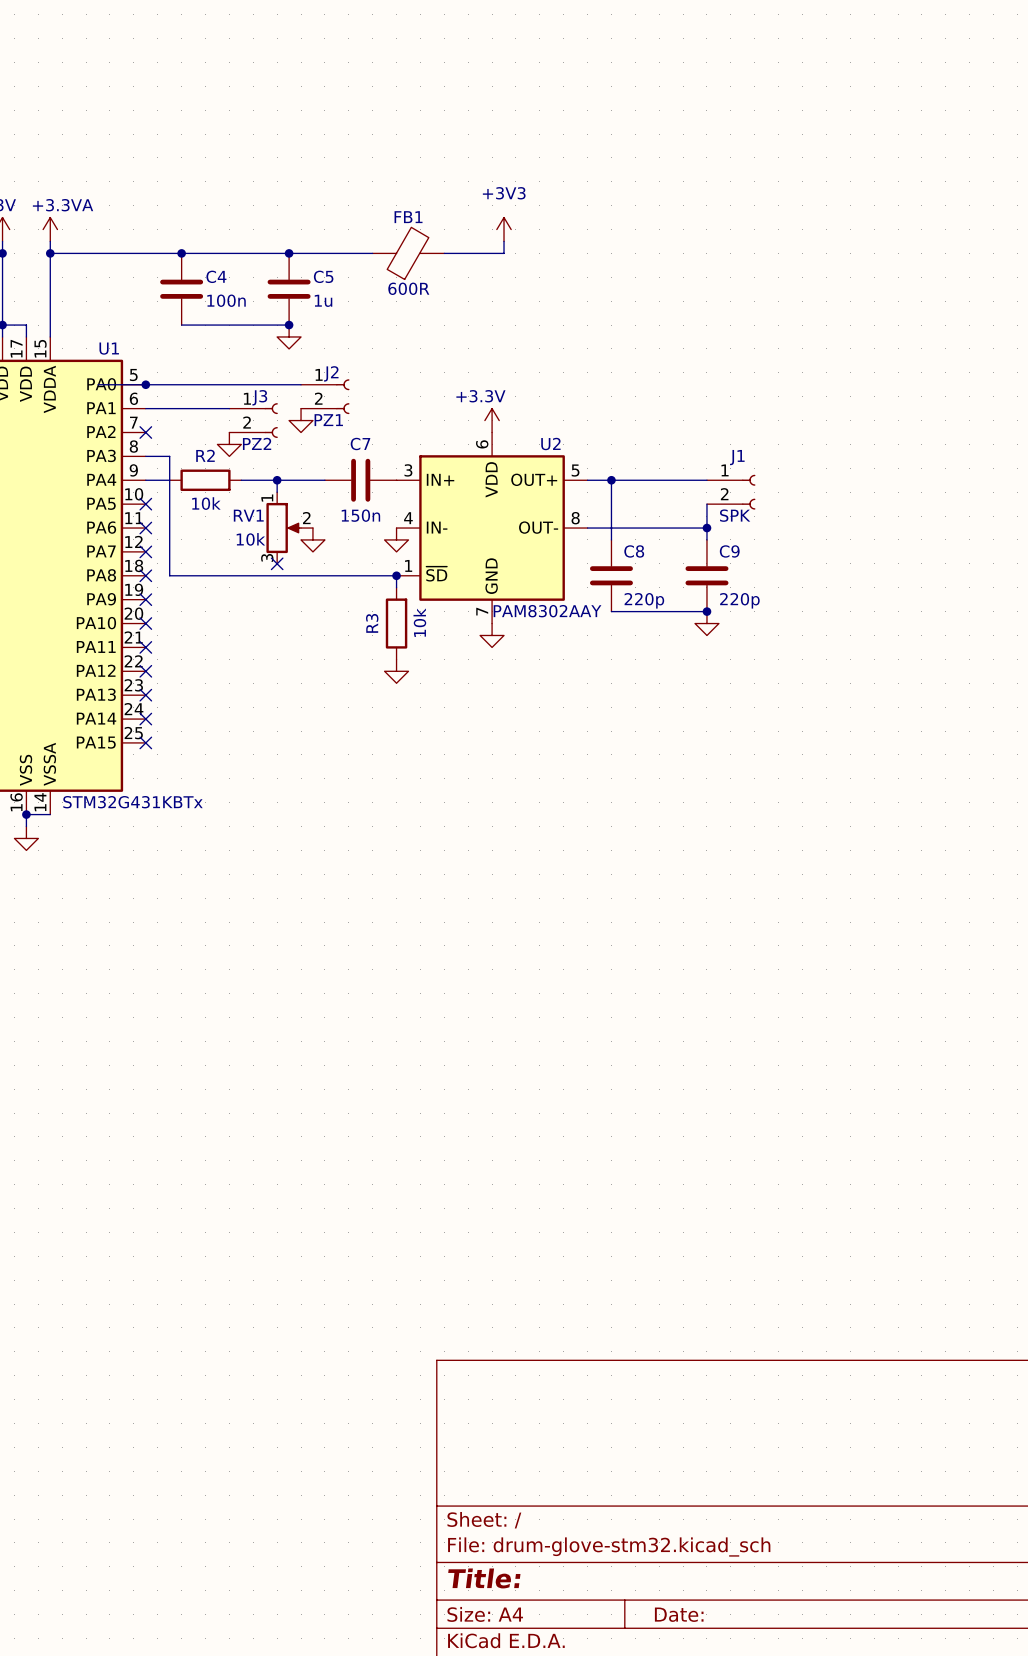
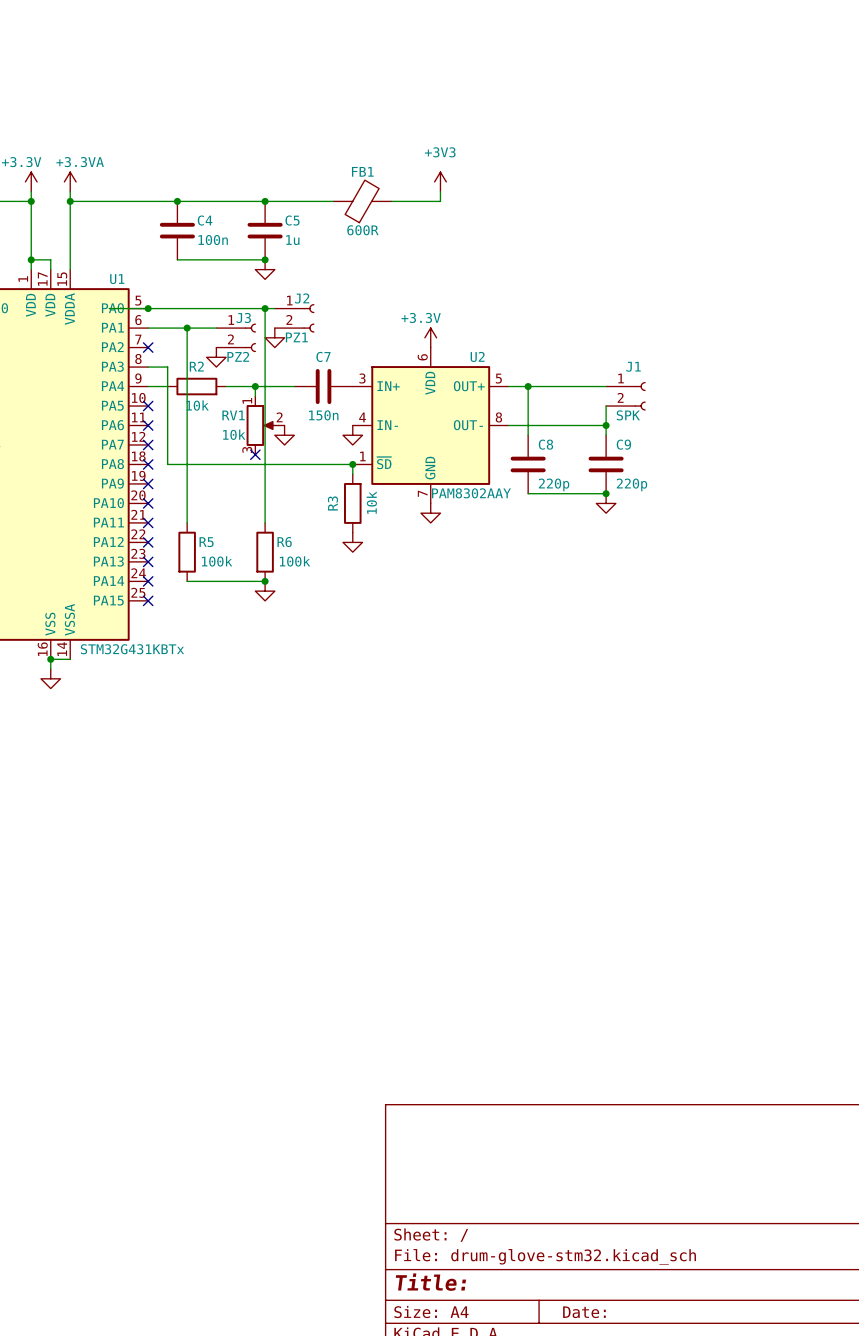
wire: none -> (265, 308) (265, 522)
junction: none -> (265, 308)
wire: none -> (187, 328) (187, 522)
junction: none -> (187, 328)
R5: none -> 100k (187, 552)
R6: none -> 100k (265, 552)
wire: none -> (187, 581) (265, 581)
junction: none -> (265, 581)
power symbol: none -> (265, 591)

